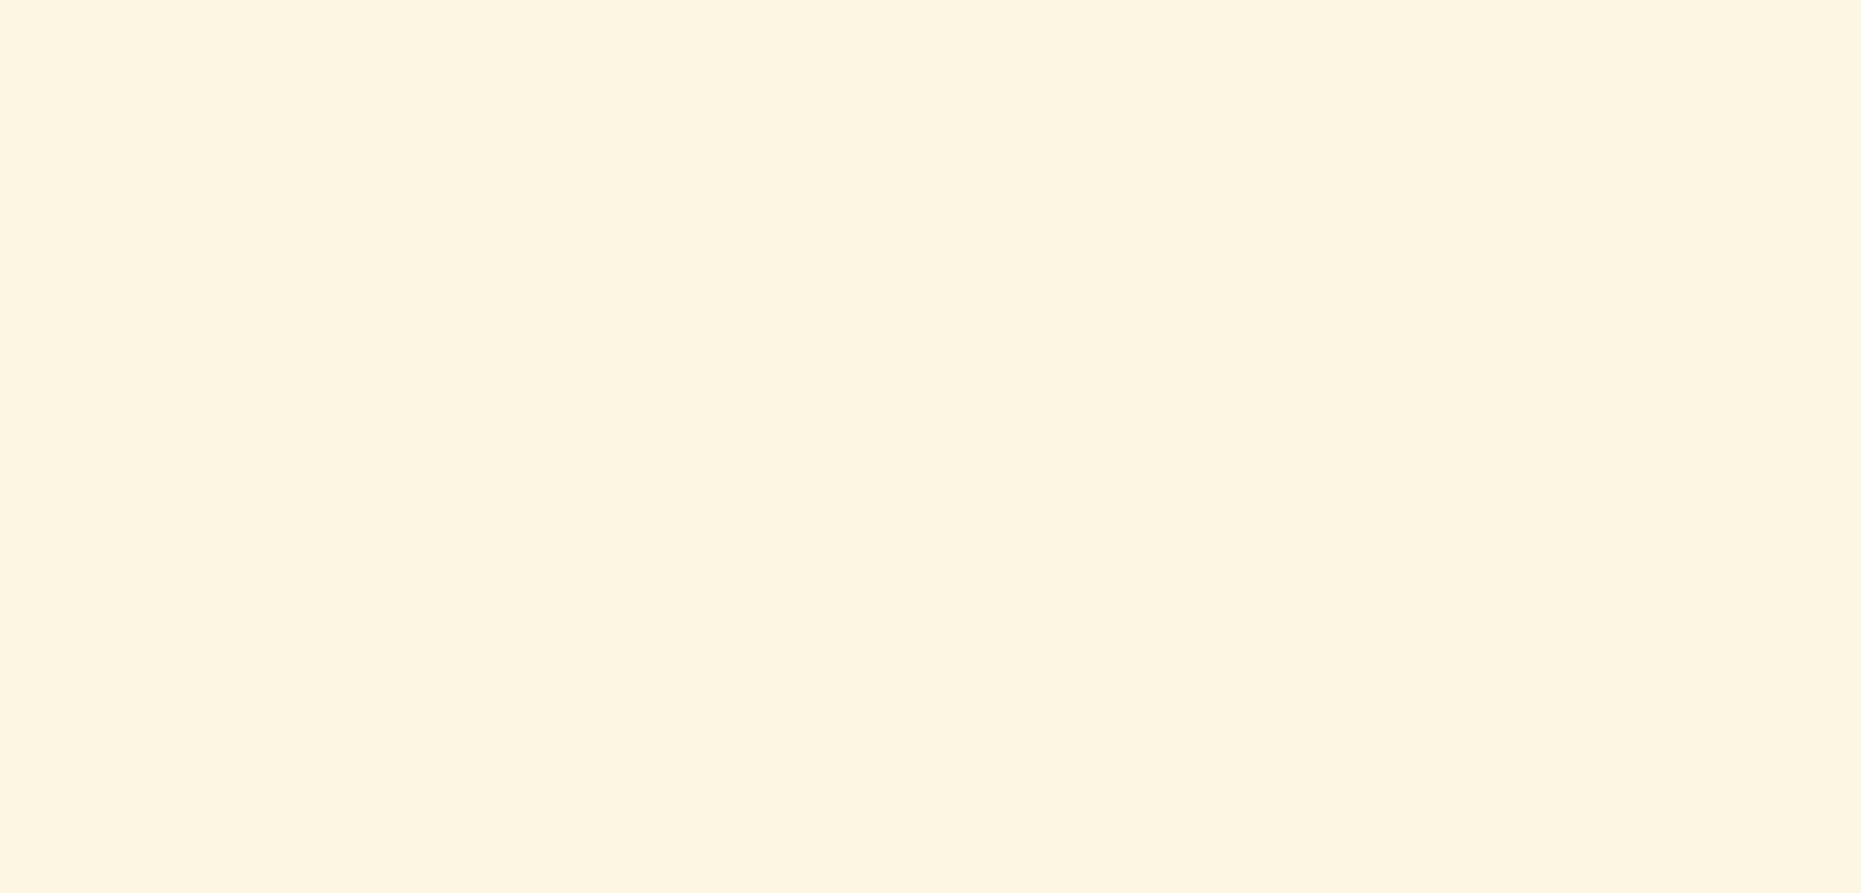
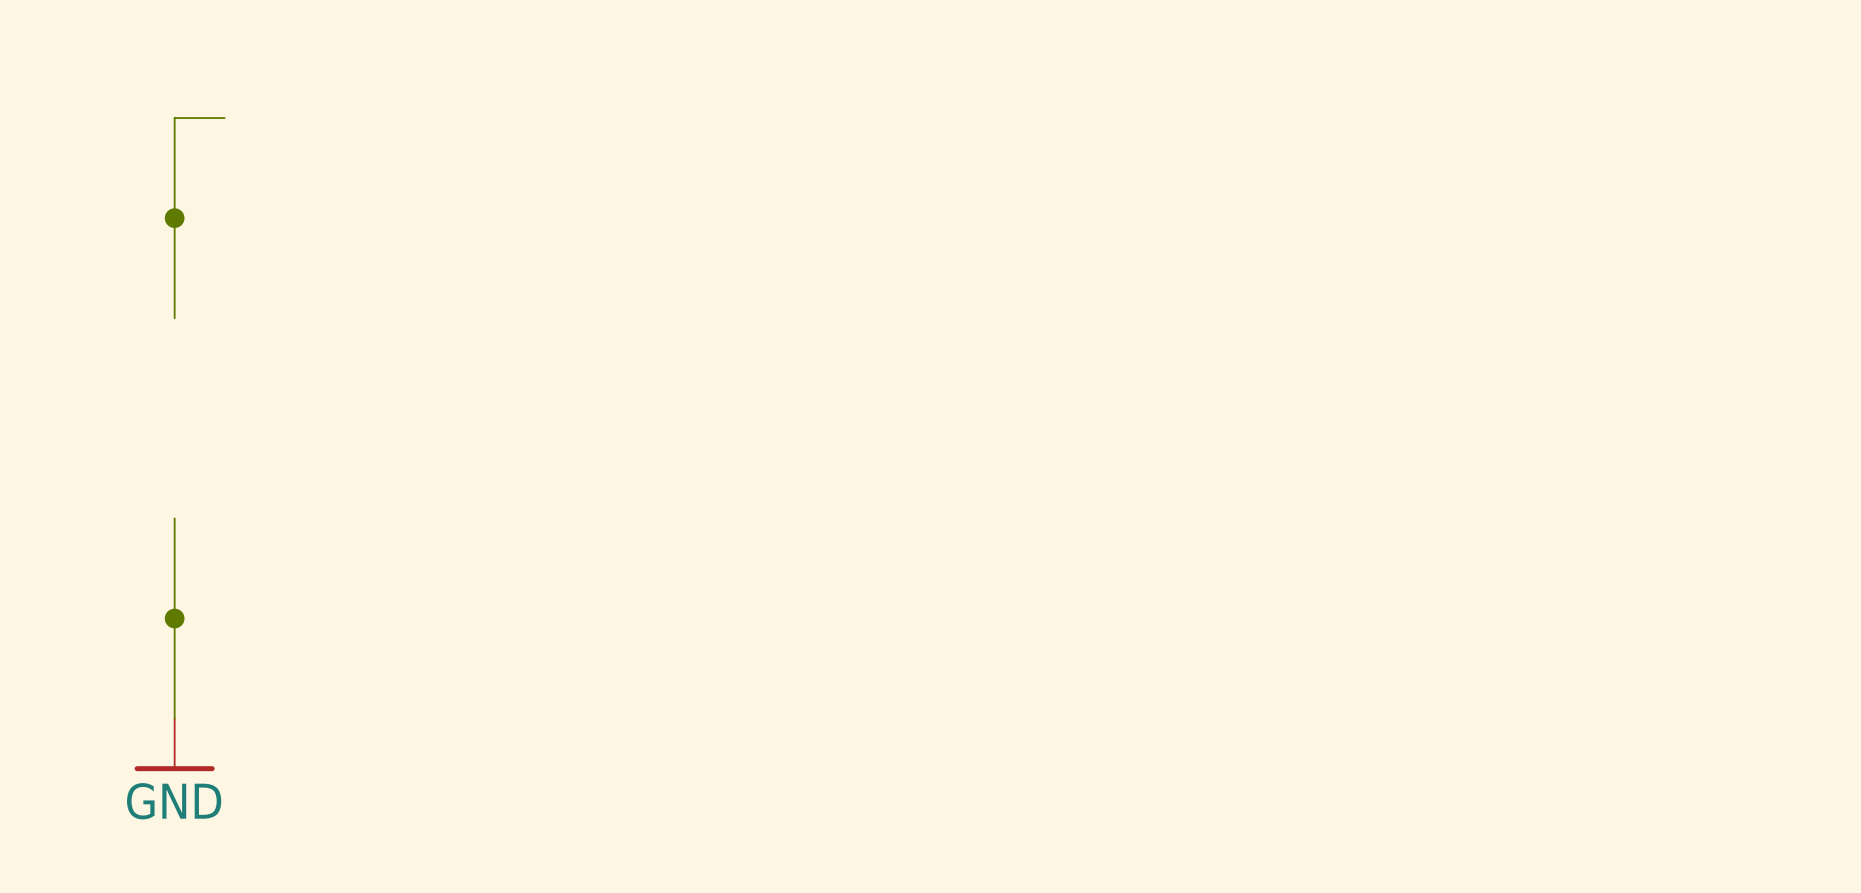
wire: none -> (224, 118) (174, 118) (174, 318)
junction: none -> (174, 218)
wire: none -> (174, 518) (174, 718)
junction: none -> (174, 618)
power symbol: none -> GND (174, 744)

